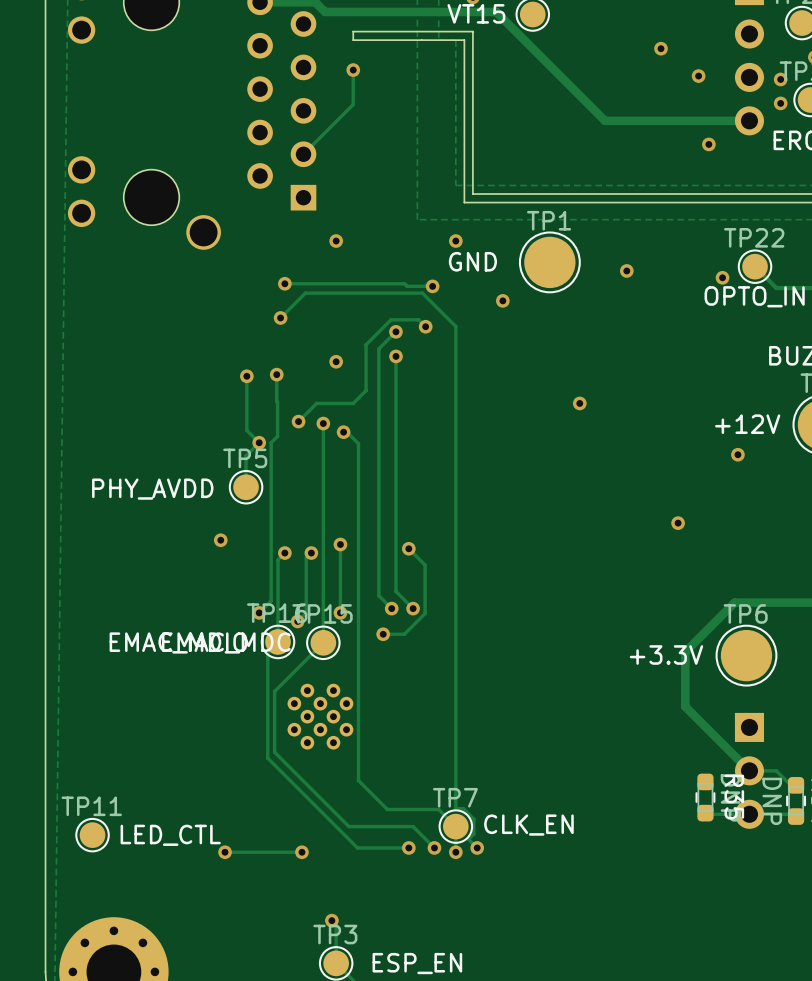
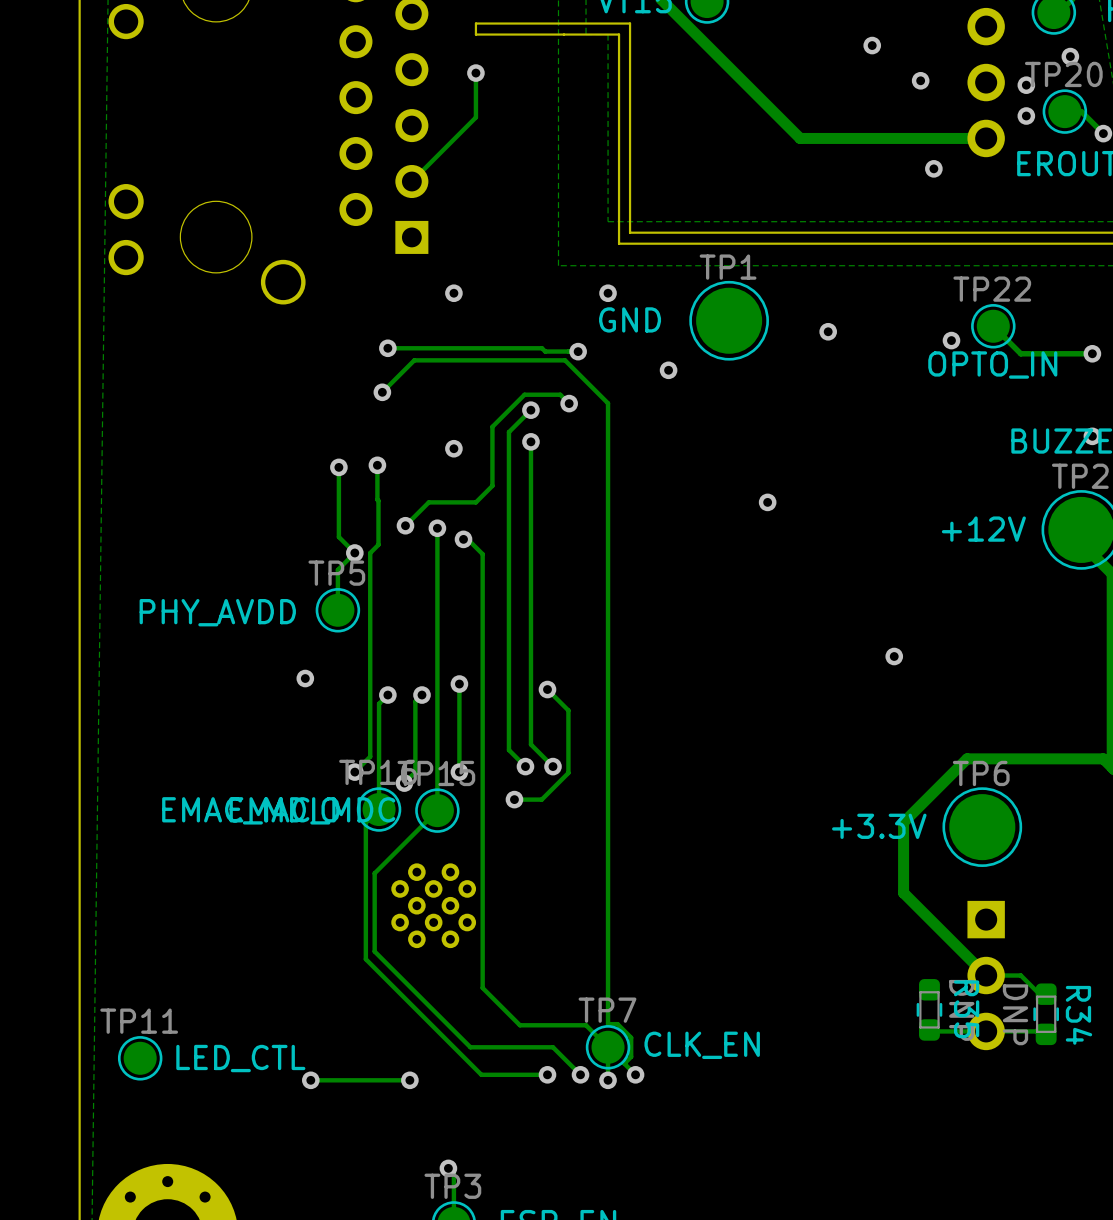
via: (737, 454) -> none

